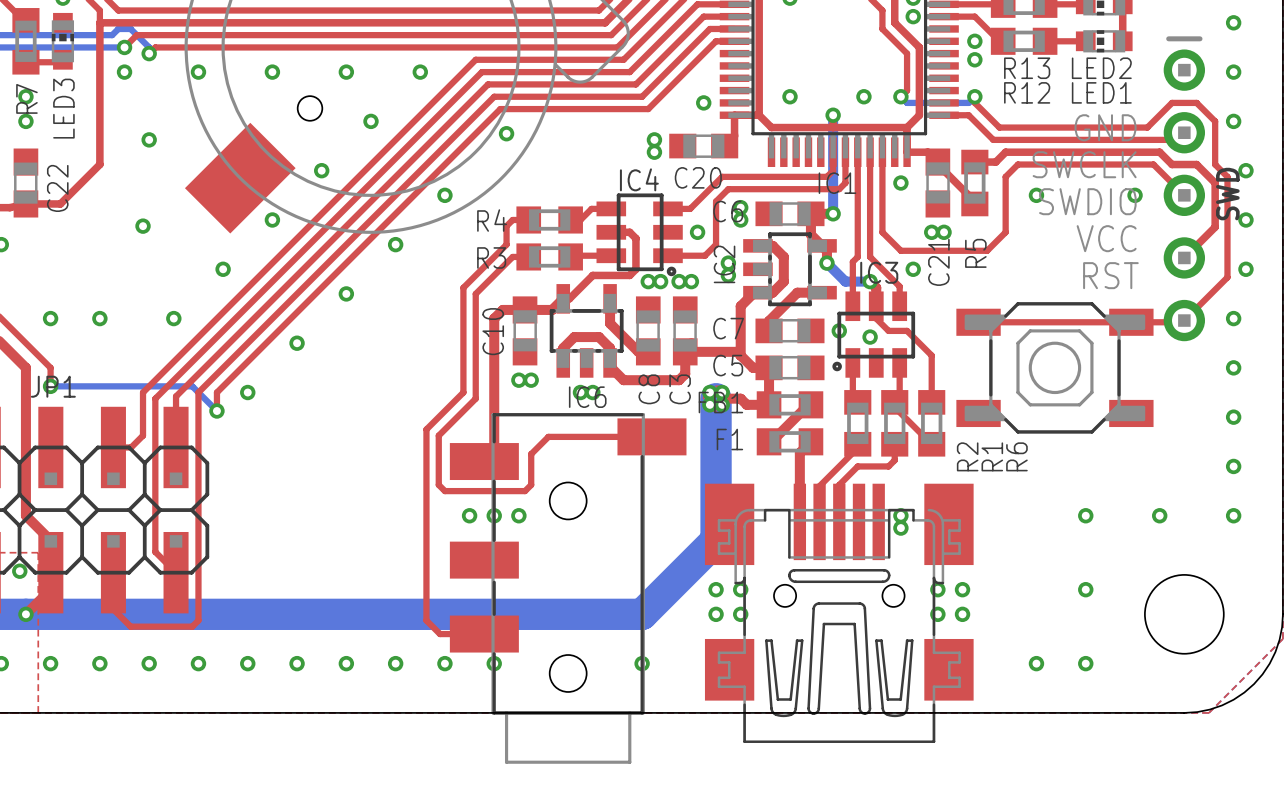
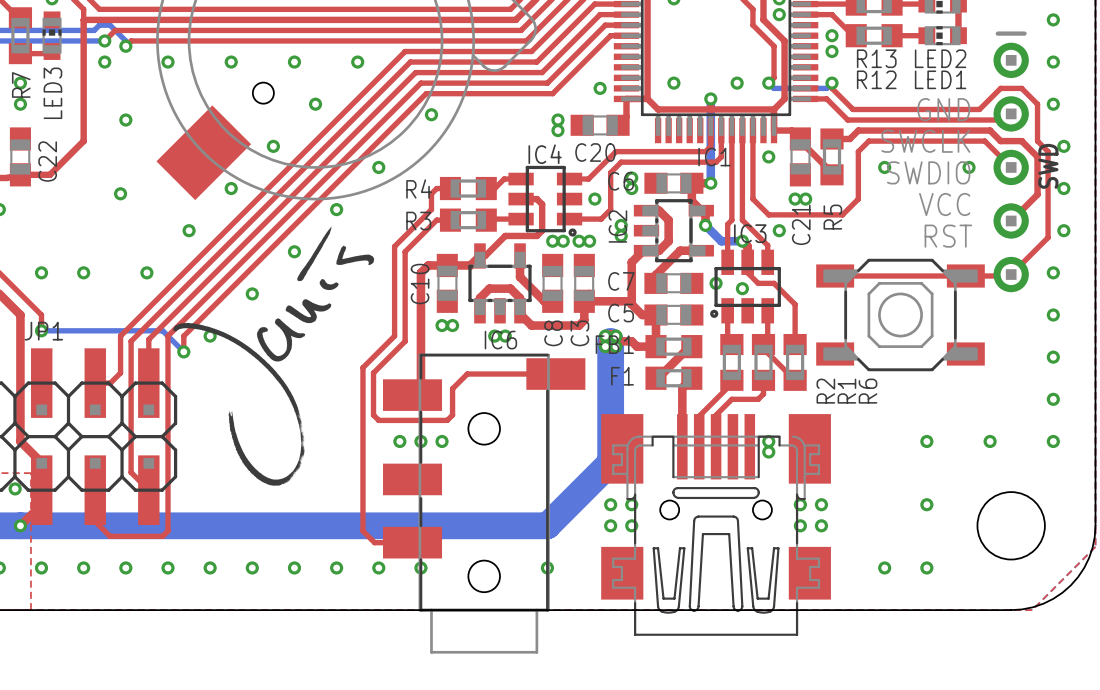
drawing: none -> [173, 225, 375, 486]

